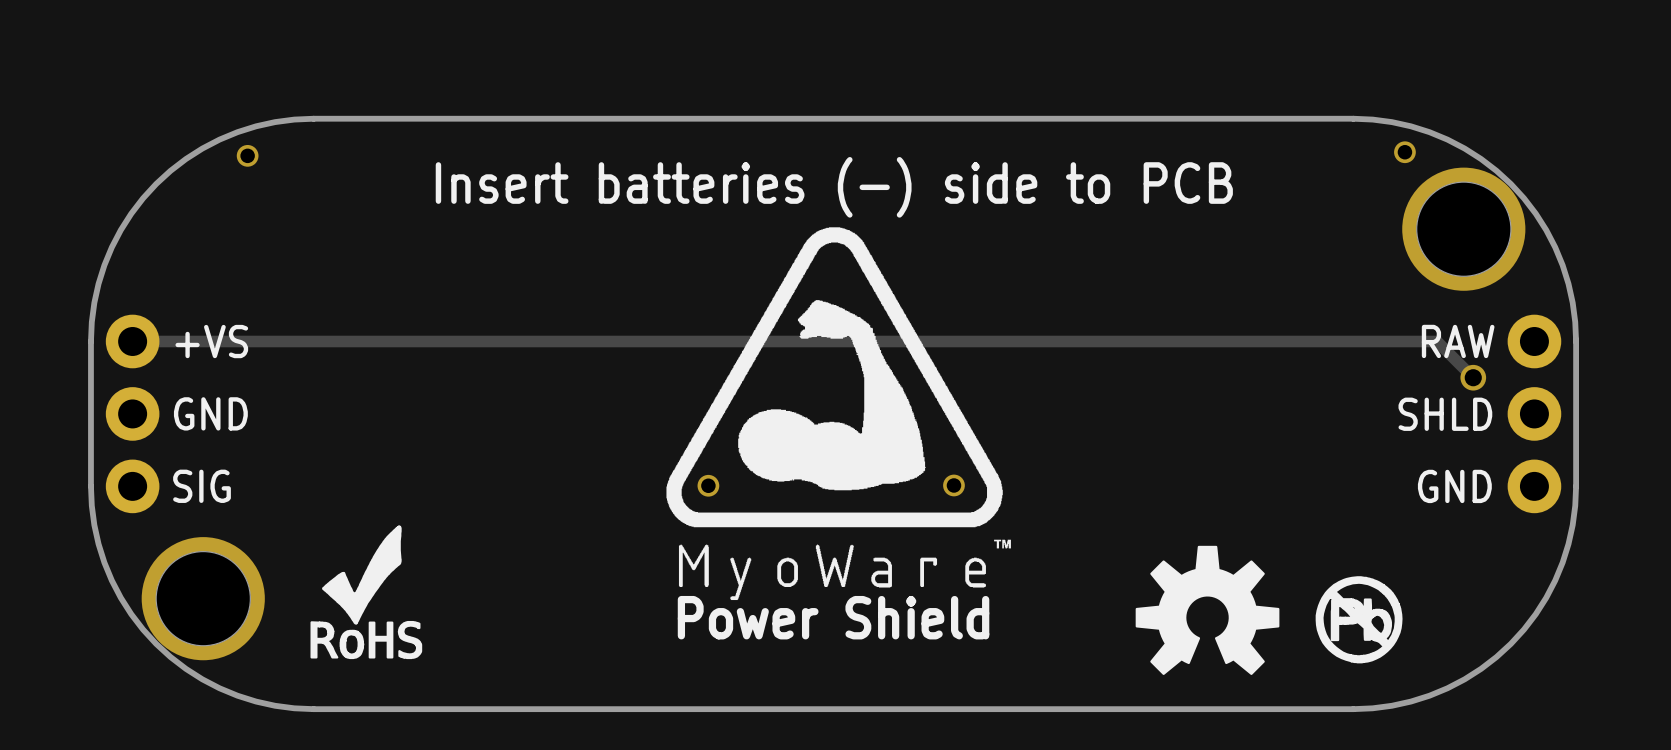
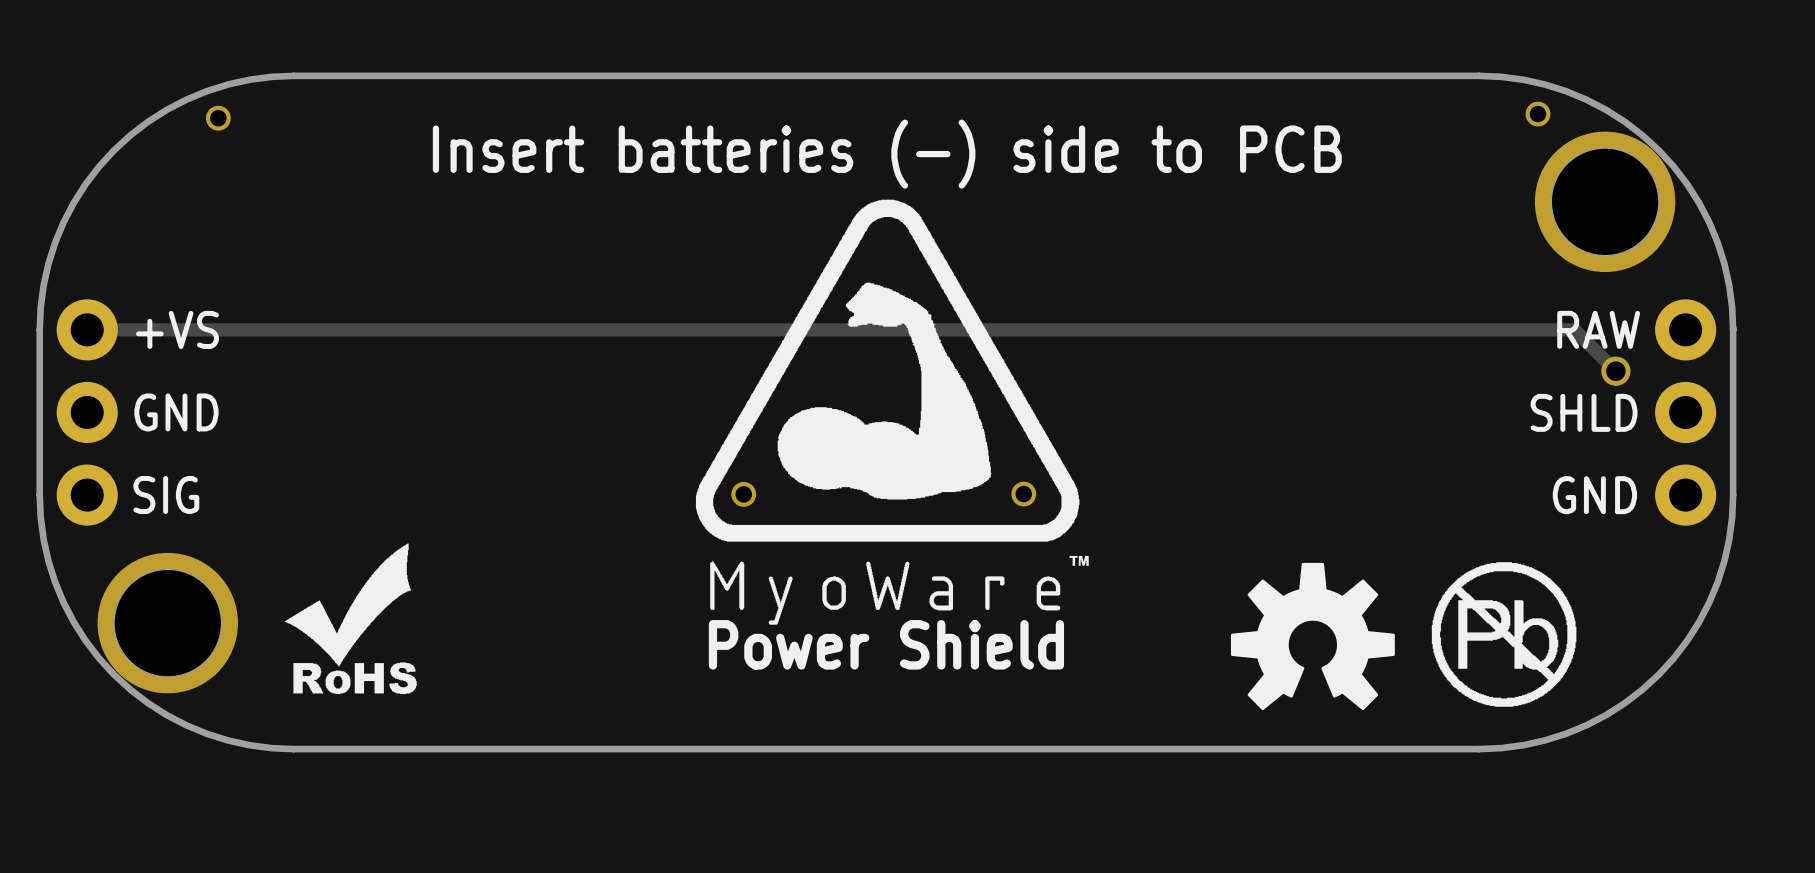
drawing shape: [310, 525, 423, 660] -> [284, 543, 417, 695]
drawing shape: [1315, 576, 1403, 664] -> [1431, 562, 1577, 707]

